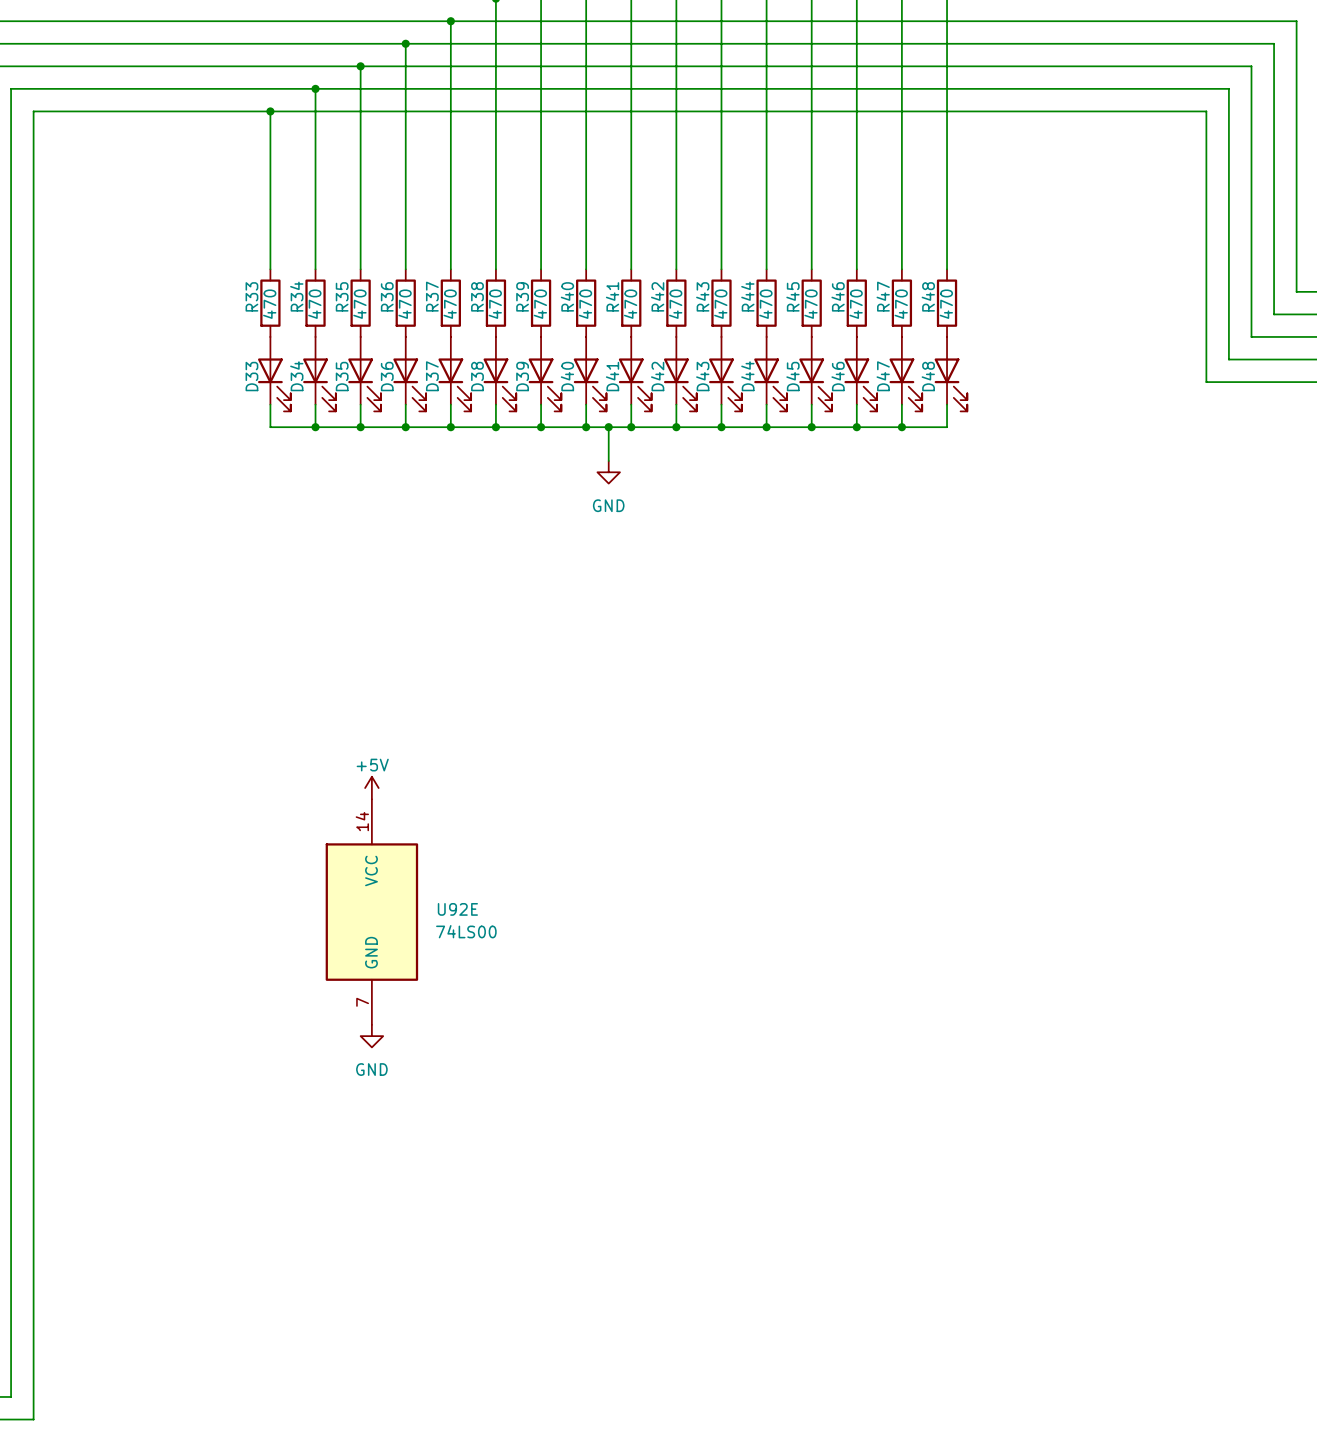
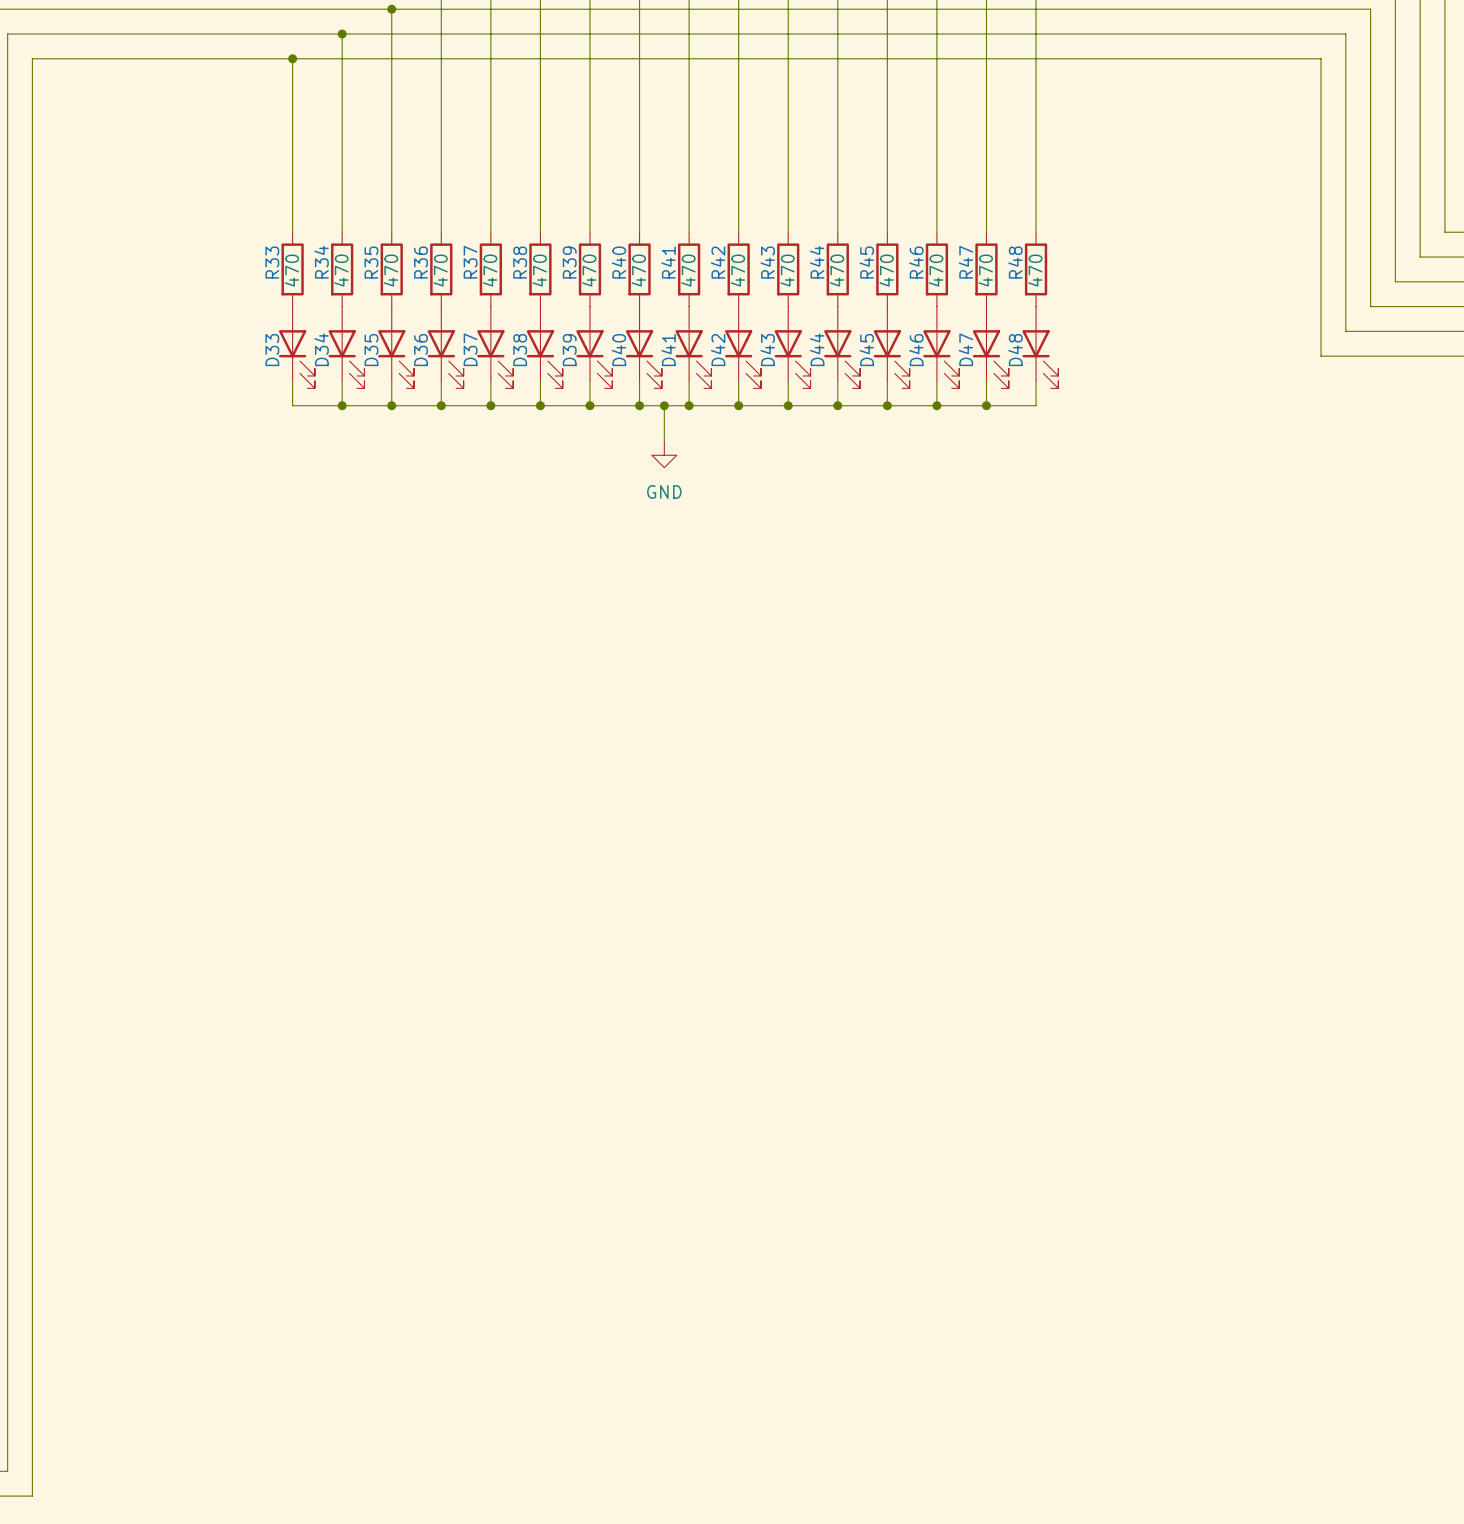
power symbol: +5V (371, 788) -> none
U92E: 74LS00 (371, 912) -> none
power symbol: GND (371, 1036) -> none

